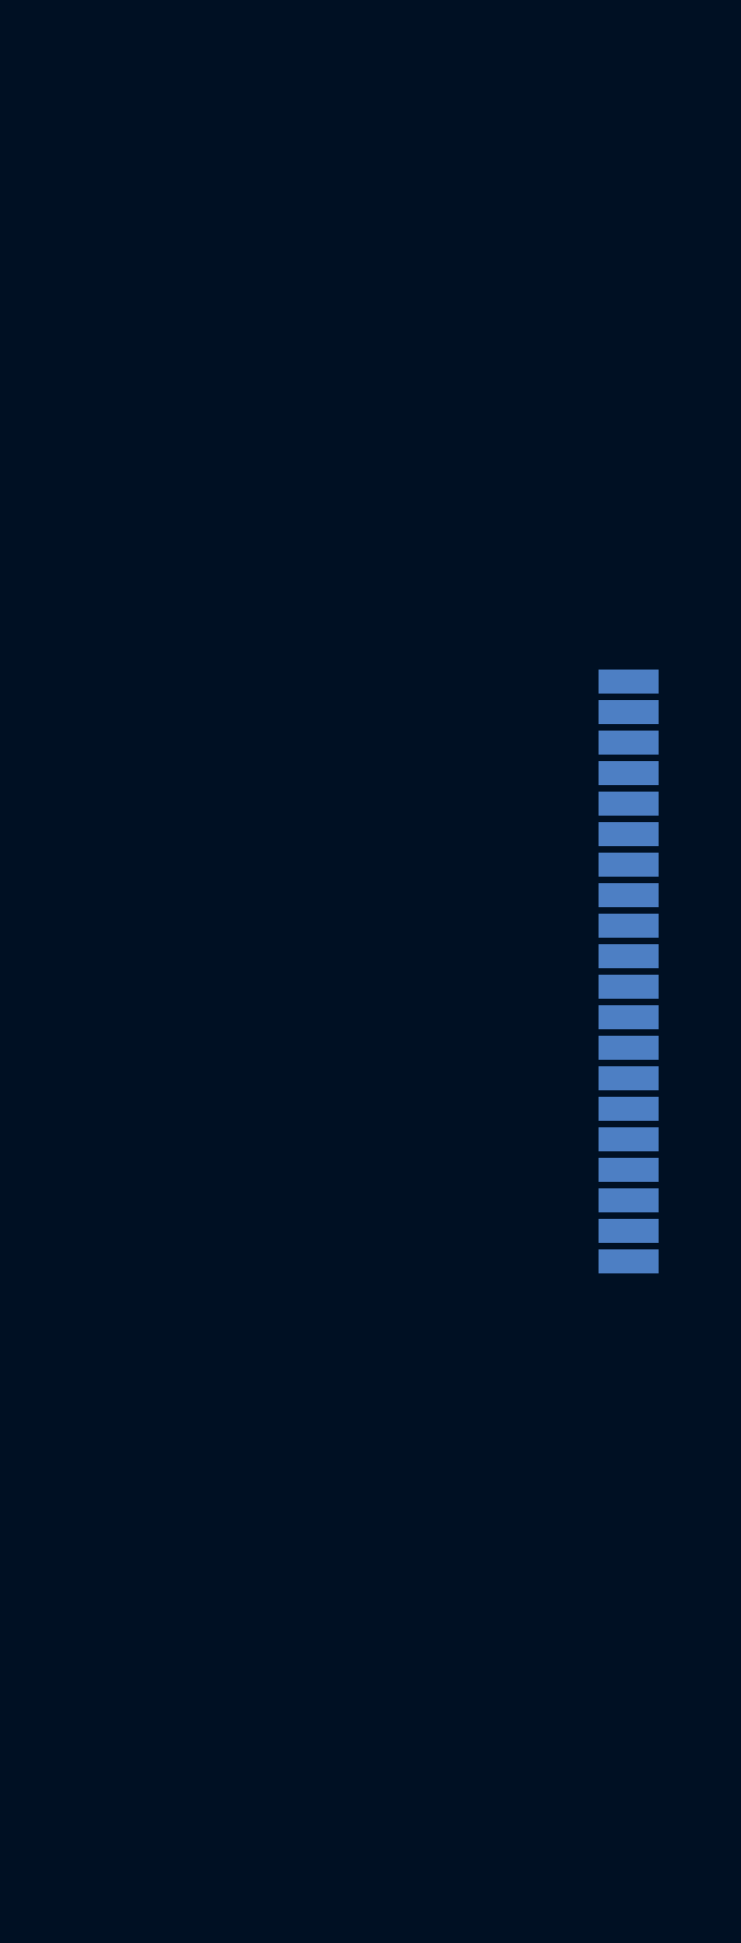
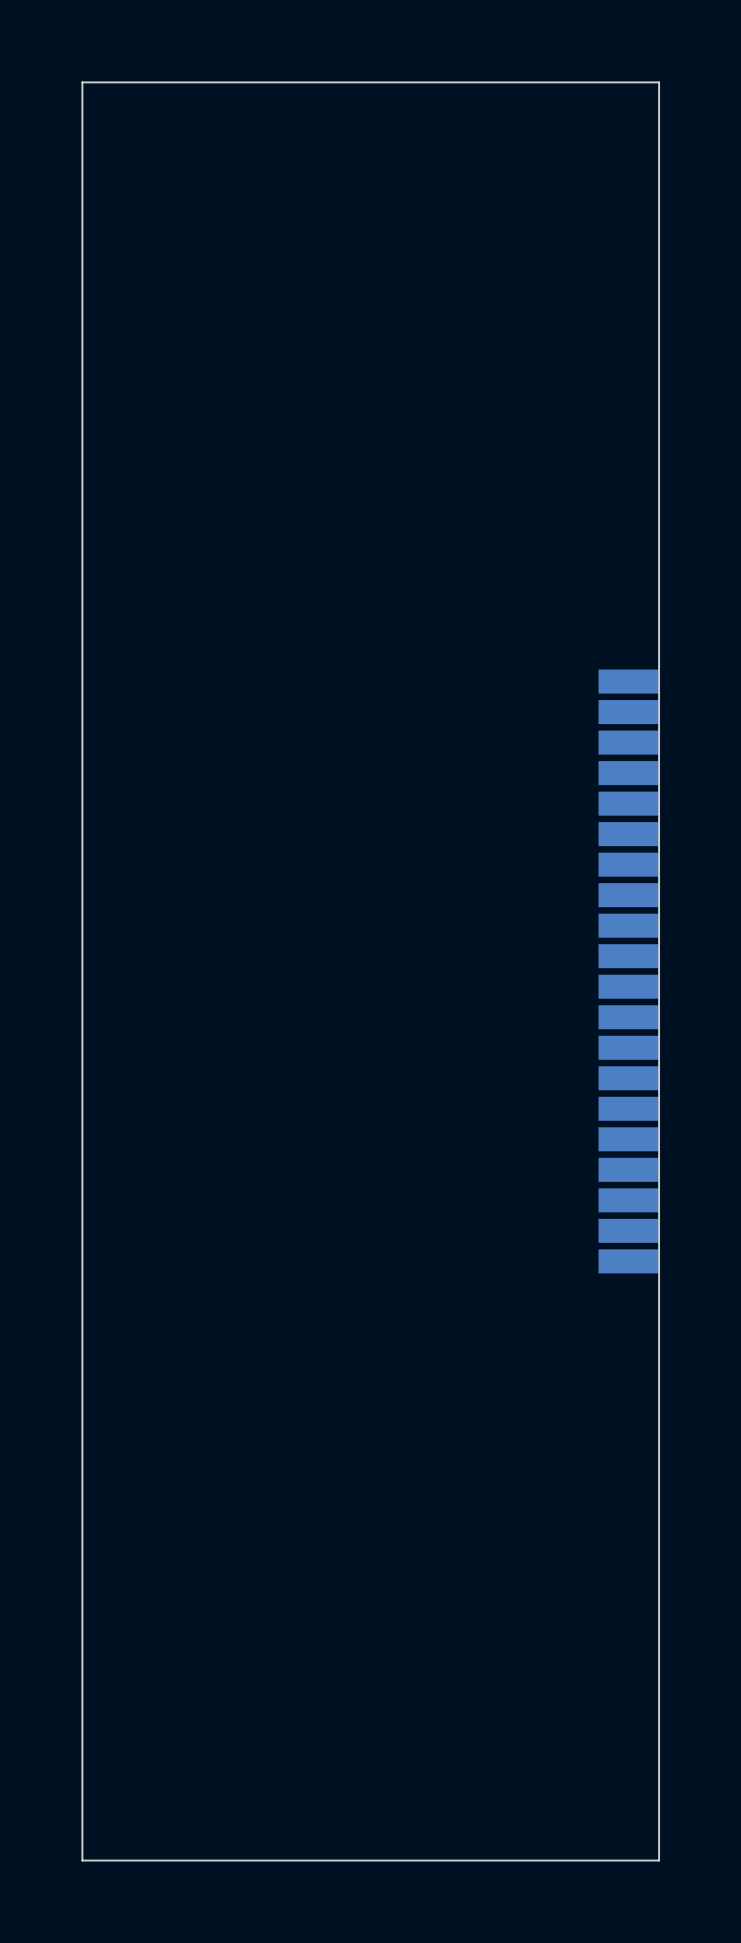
board edge: none -> (659, 82) (82, 82) (82, 1860) (659, 1860) (659, 82)

